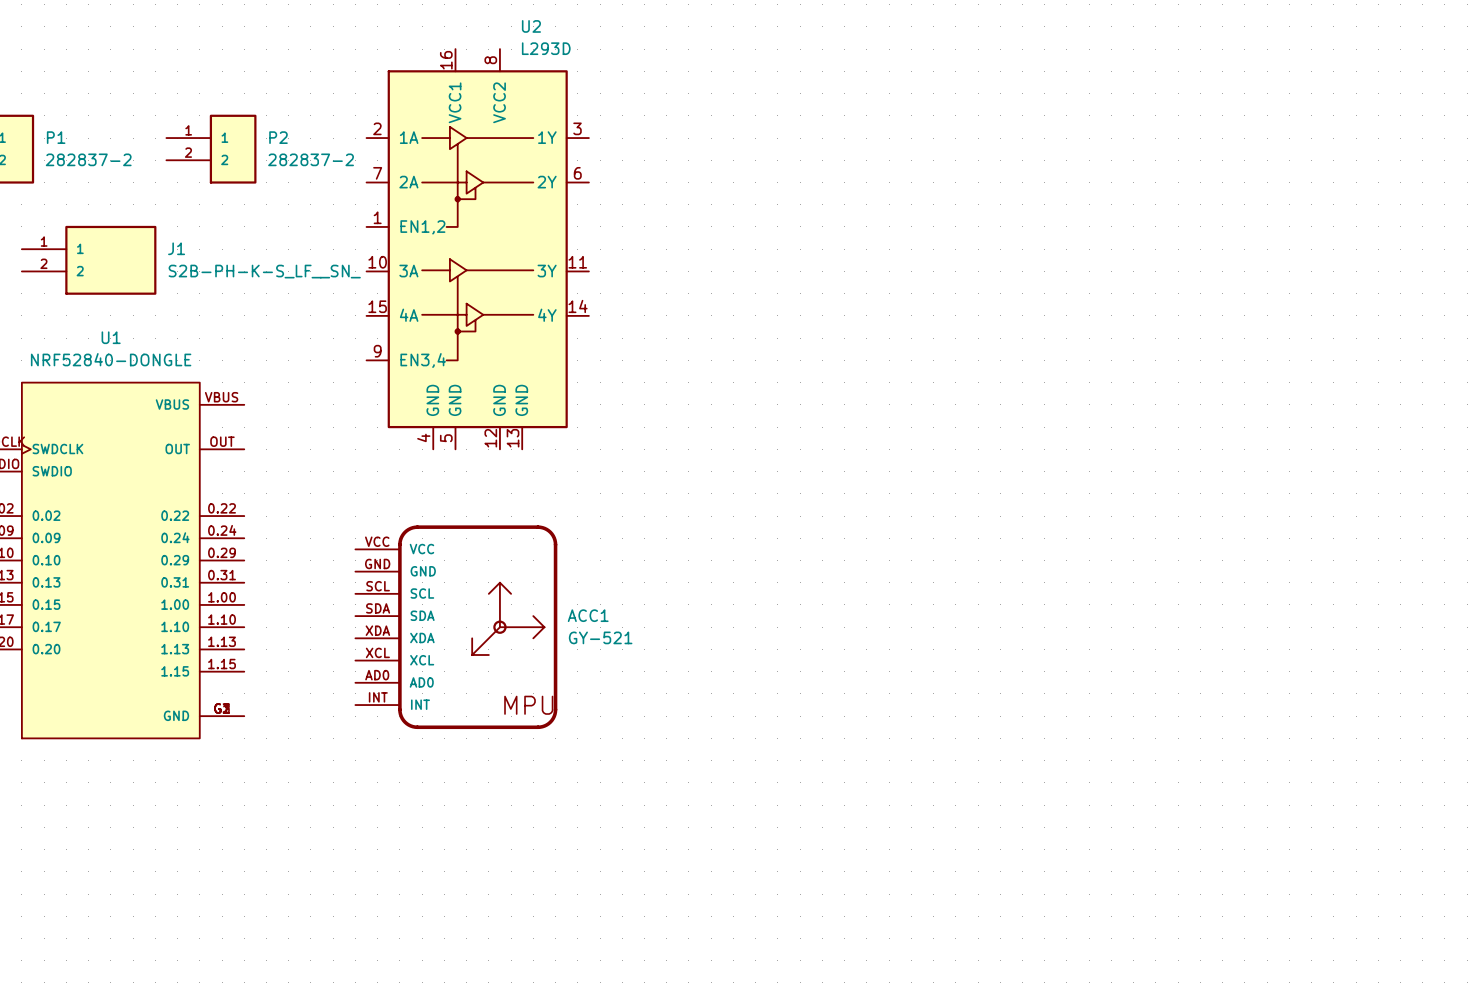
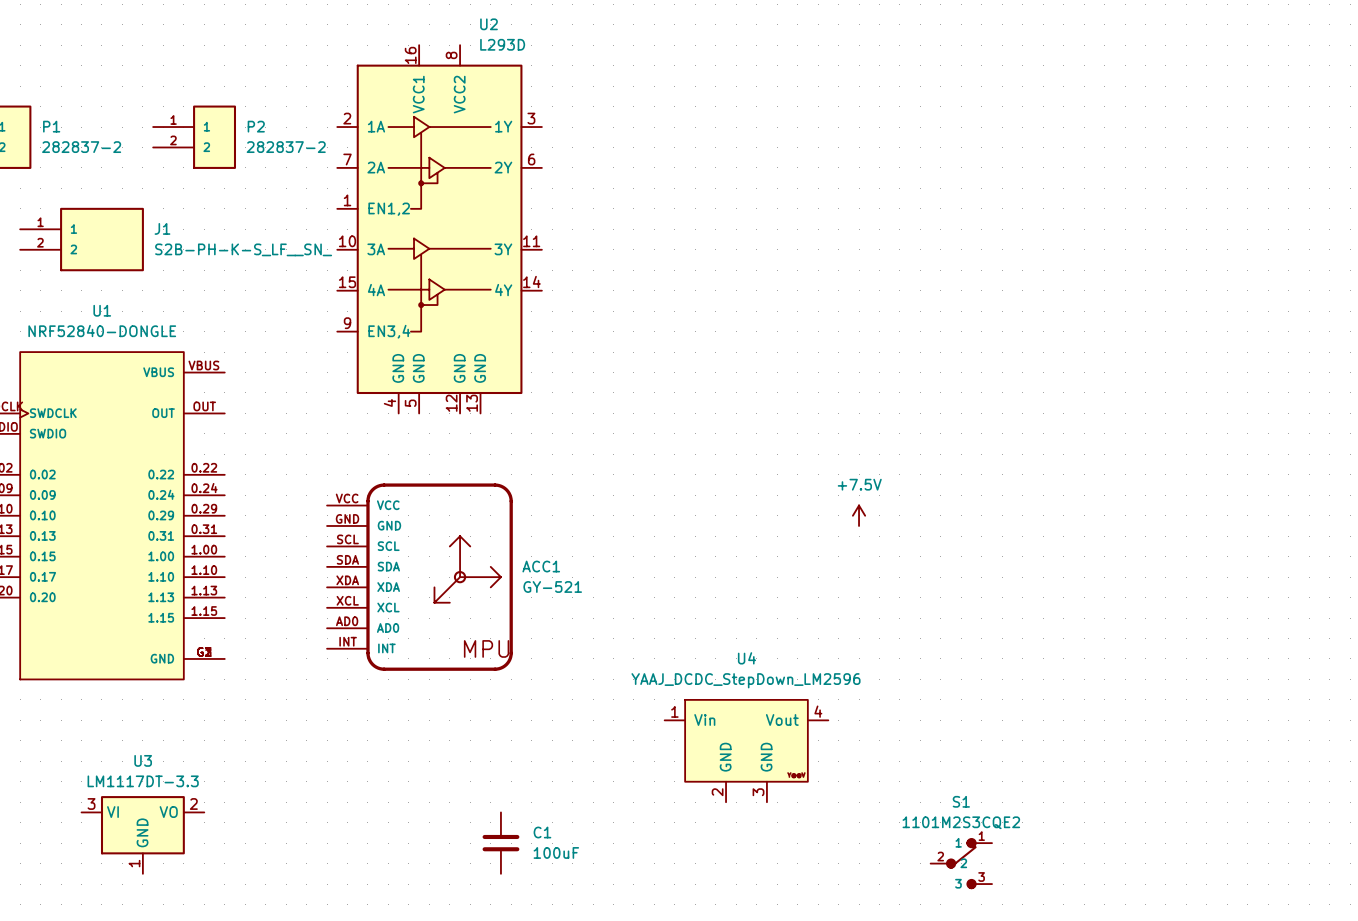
power symbol: none -> +7.5V (859, 515)
U4: none -> YAAJ_DCDC_StepDown_LM2596 (746, 751)
U3: none -> LM1117DT-3.3 (142, 834)
C1: none -> 100uF (500, 843)
S1: none -> 1101M2S3CQE2 (961, 863)

